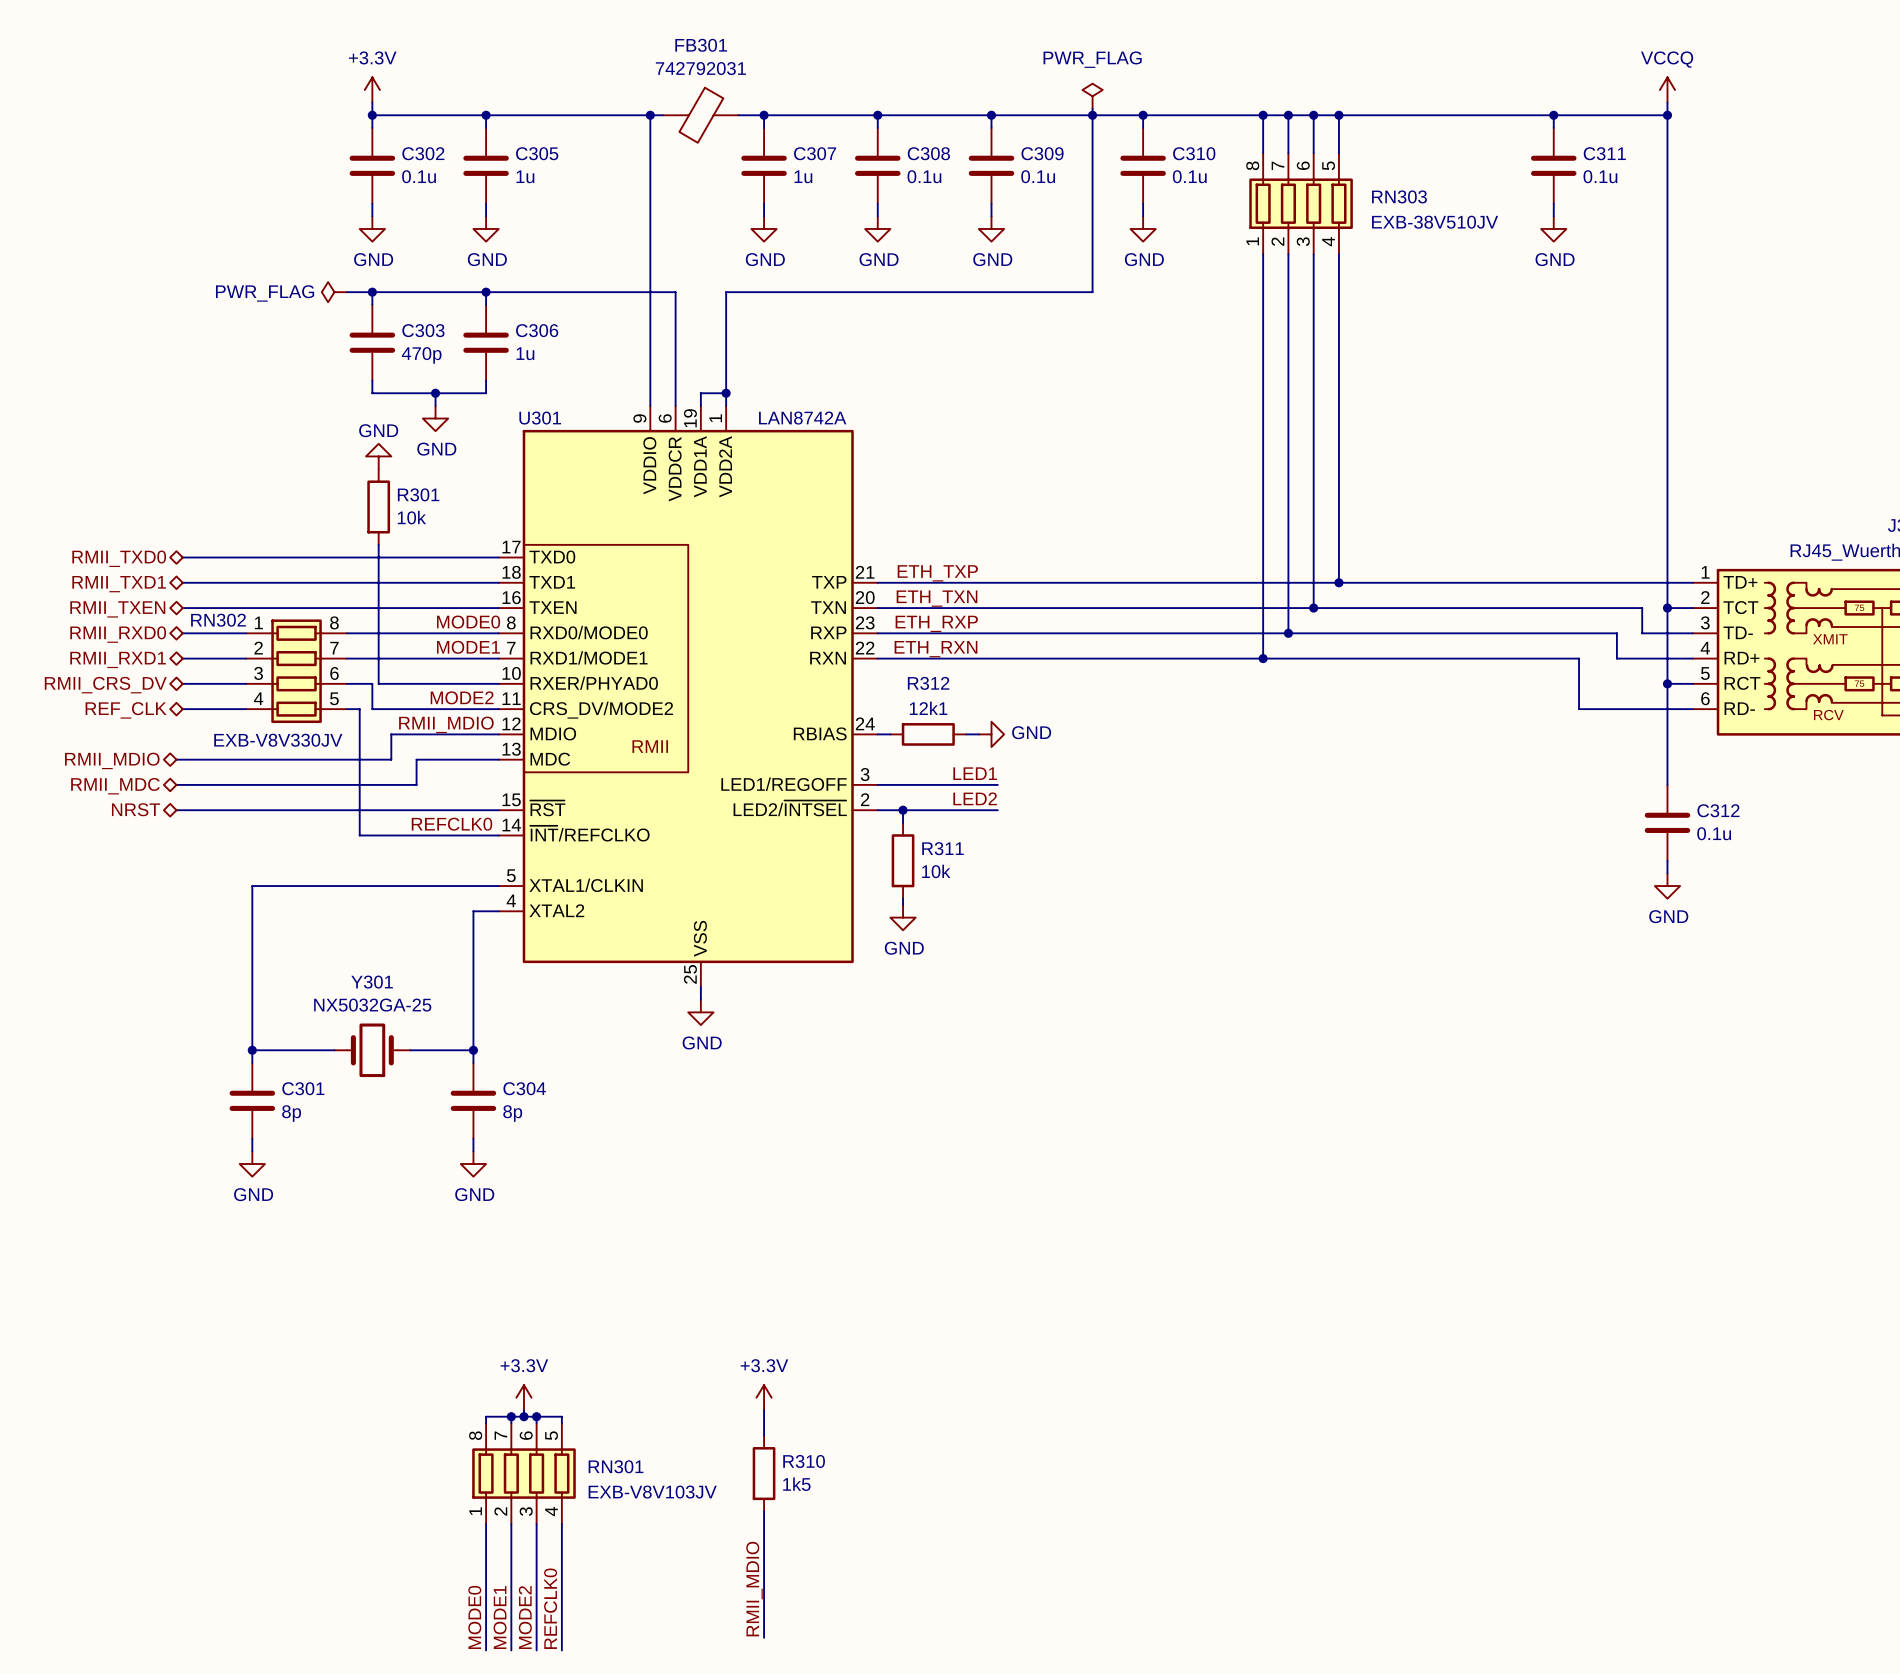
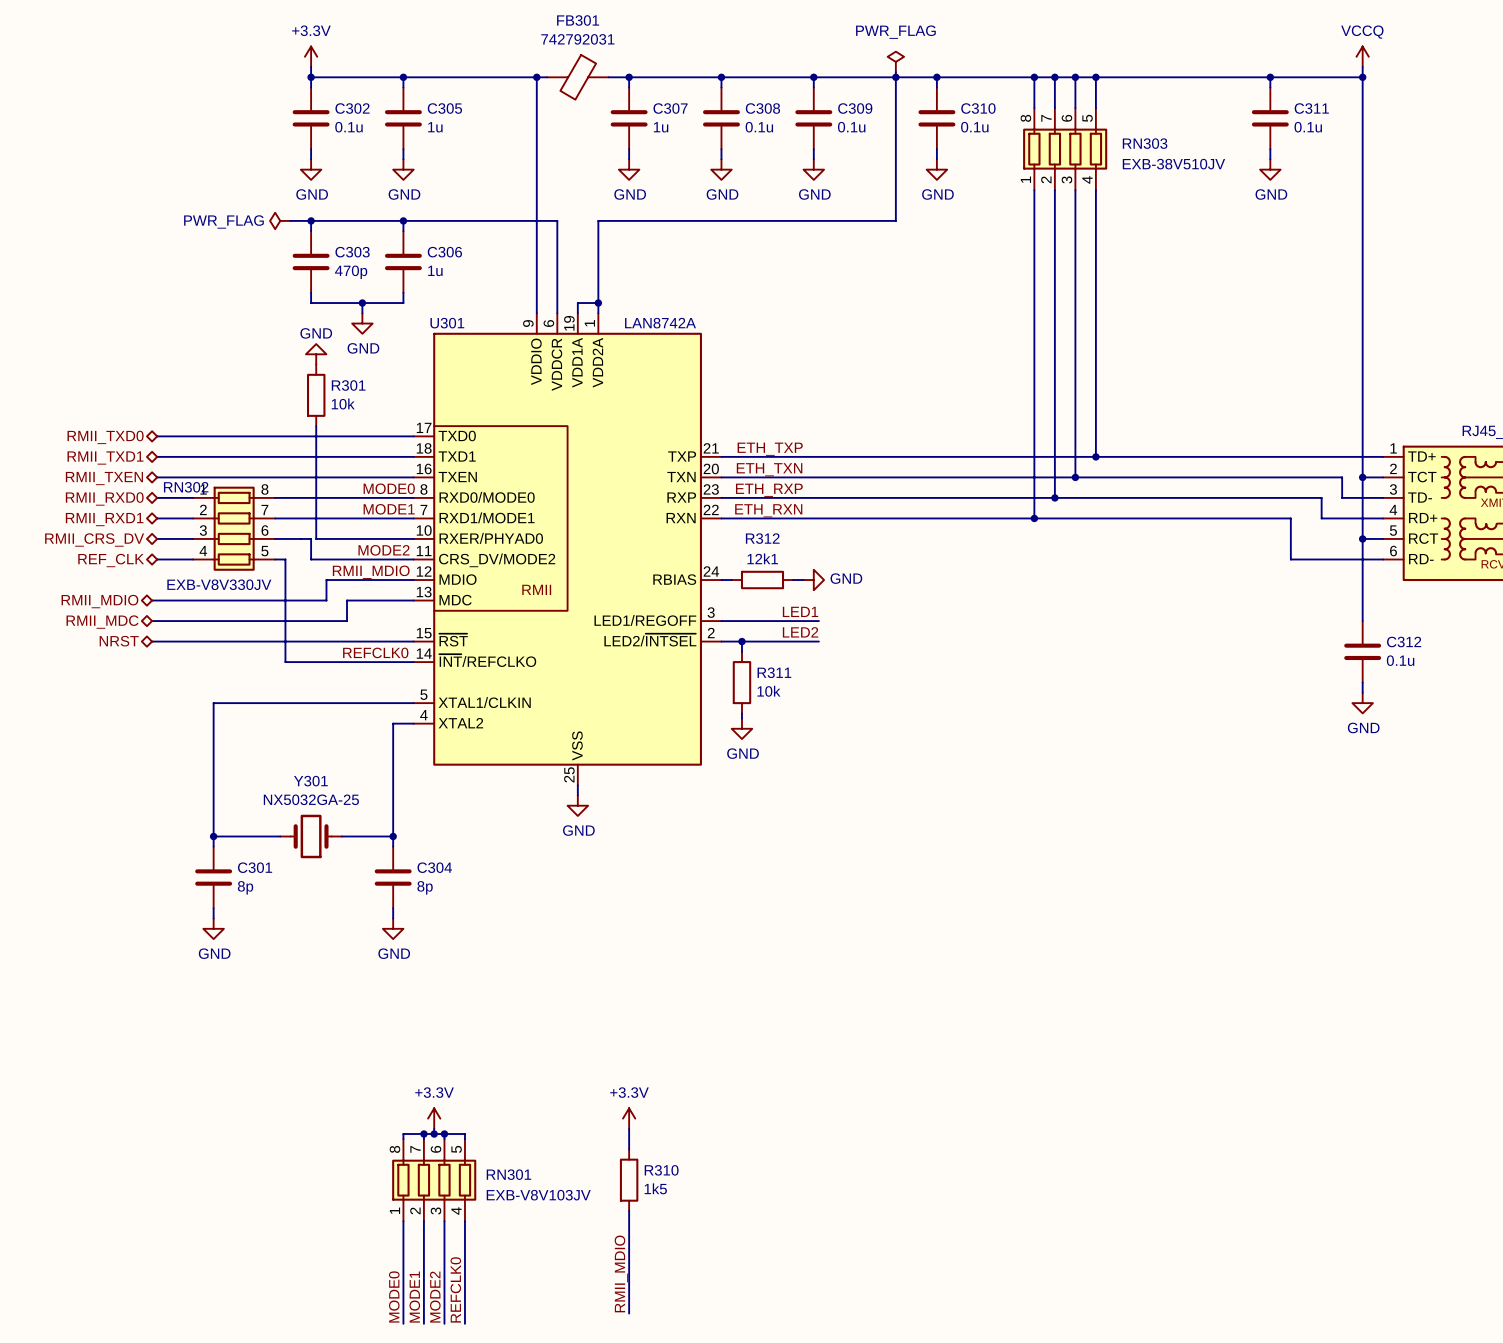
RN302 position: (296, 671) -> (234, 528)
wire: (347, 709) (359, 709) (359, 835) -> (275, 559) (285, 559) (285, 662) (300, 662)

